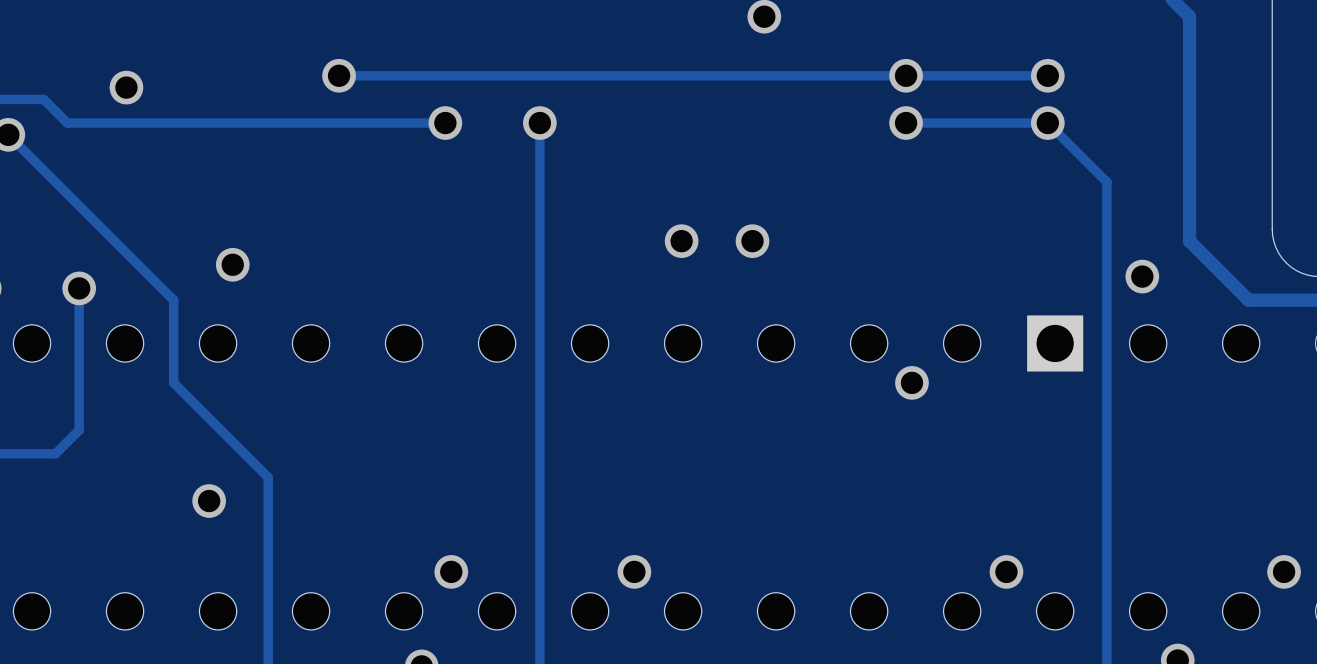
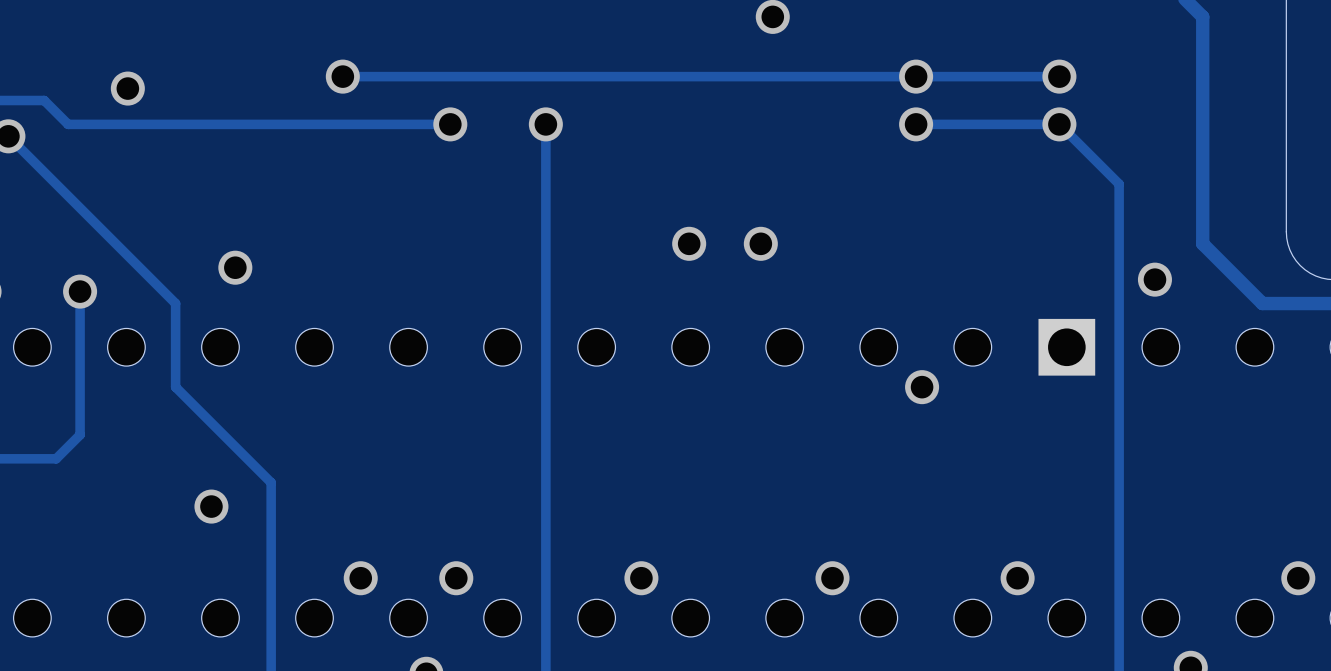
via: none -> (360, 578)
via: none -> (832, 578)

